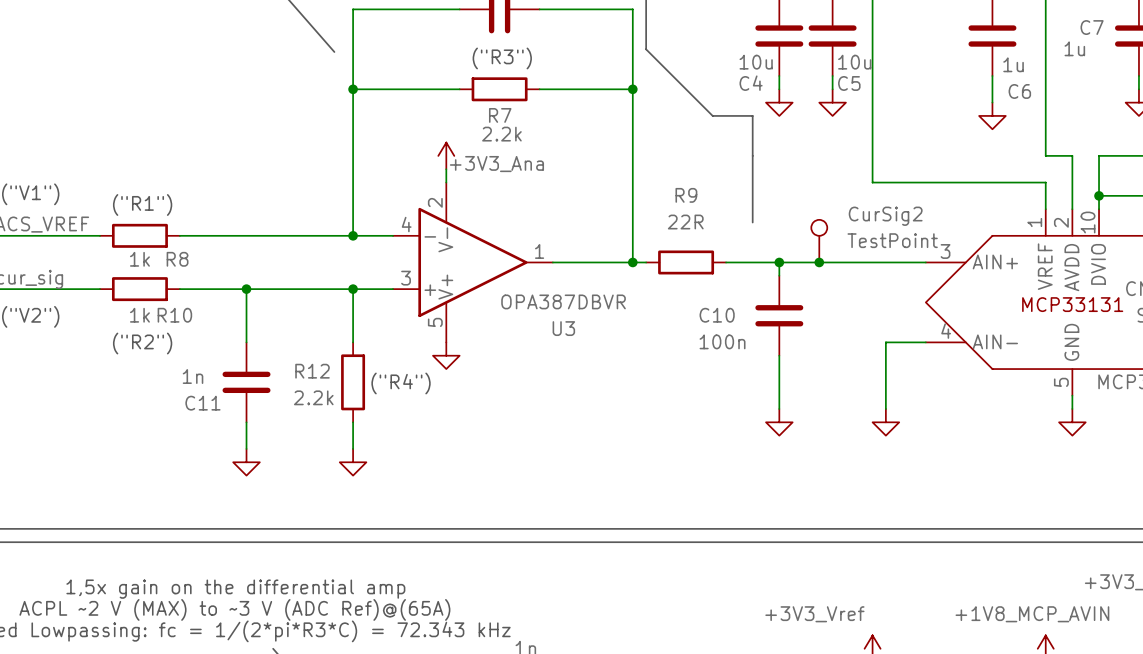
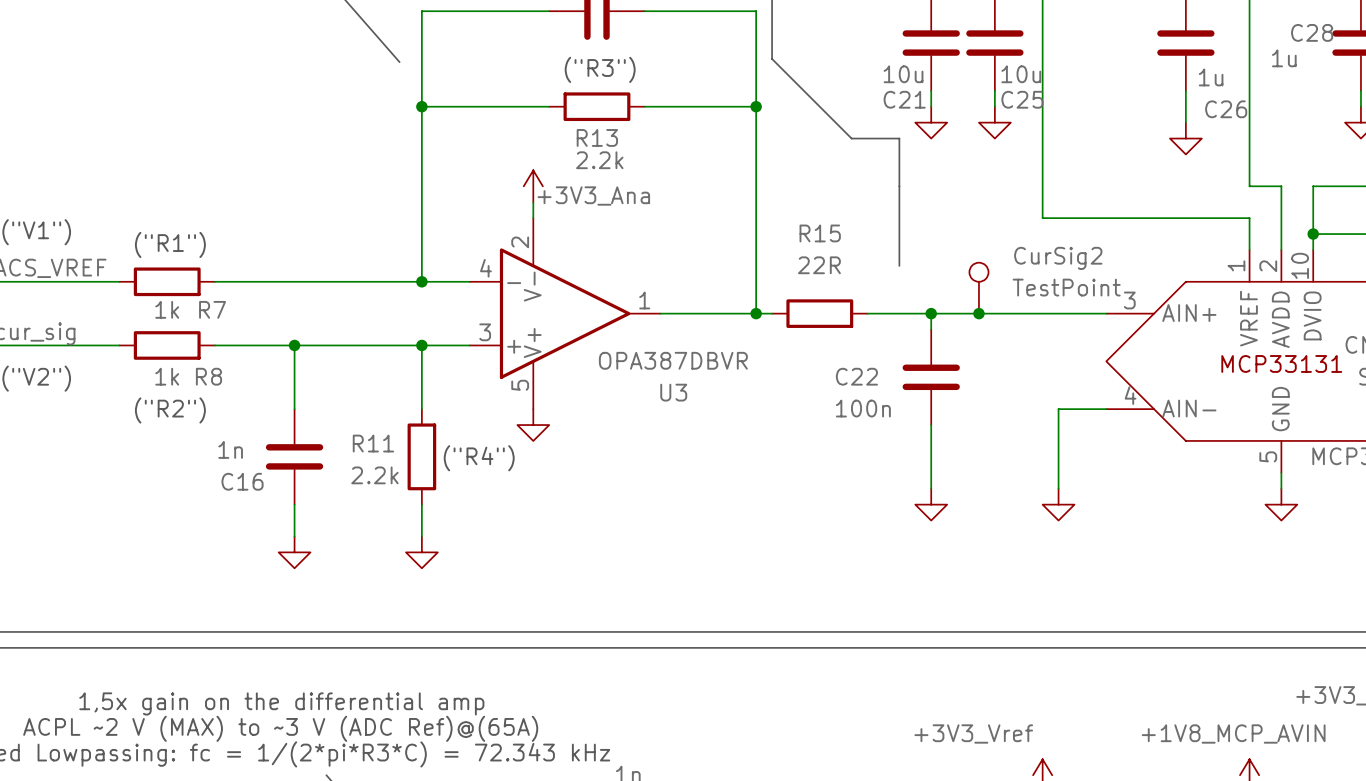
C7 name: C7 (1092, 27) -> C28 (1312, 32)
C4 name: C4 (751, 83) -> C21 (904, 99)
C5 name: C5 (849, 83) -> C25 (1022, 99)
C6 name: C6 (1019, 91) -> C26 (1226, 109)
R7 name: R7 (500, 115) -> R13 (597, 137)
R9 name: R9 (686, 195) -> R15 (820, 233)
R8 name: R8 (177, 259) -> R7 (212, 309)
R10 name: R10 (174, 315) -> R8 (208, 376)
C10 name: C10 (717, 315) -> C22 (856, 376)
R12 name: R12 (312, 371) -> R11 (373, 443)
C11 name: C11 (202, 403) -> C16 (242, 481)

